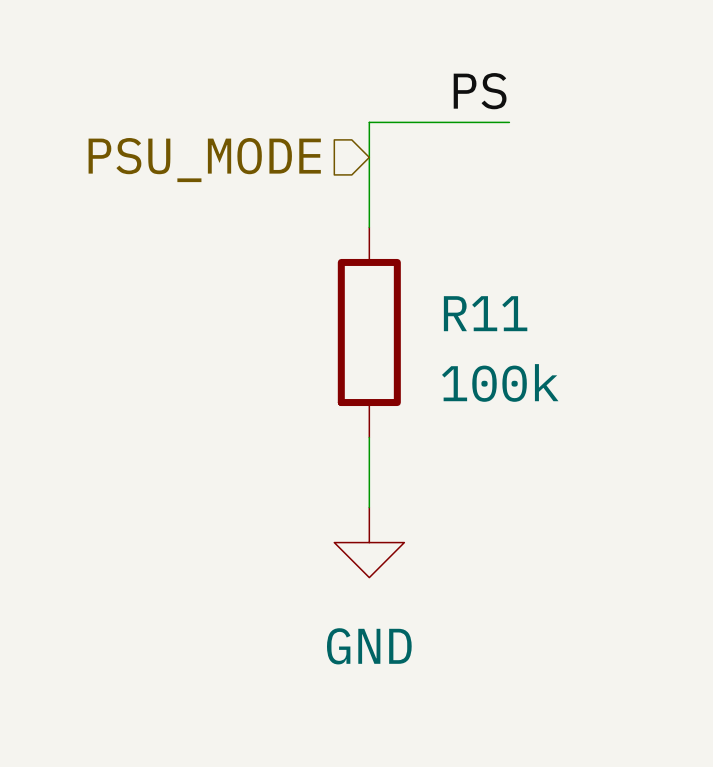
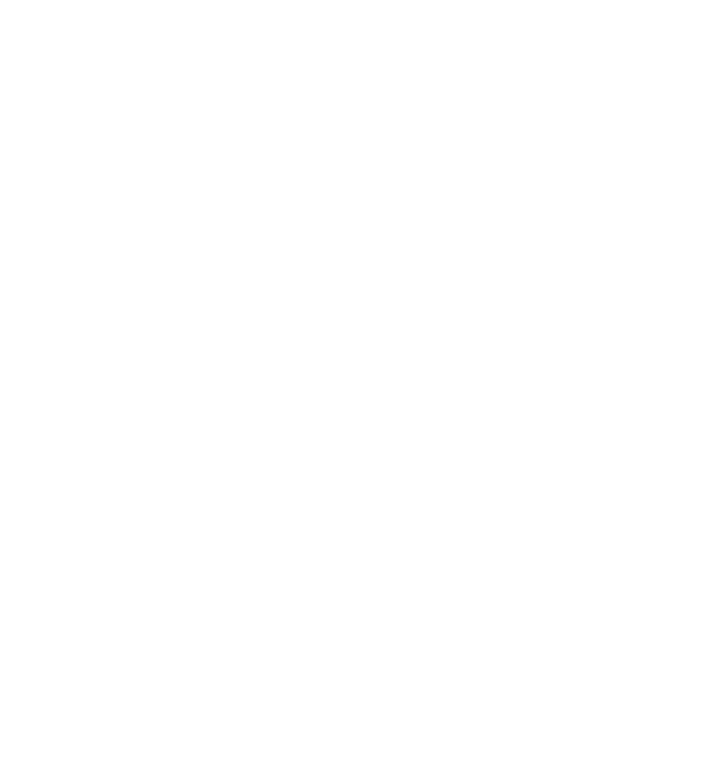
label: PS (480, 91) -> none
wire: (509, 122) (369, 122) (369, 227) -> none
hierarchical label: PSU_MODE (204, 160) -> none
R11: 100k (369, 332) -> none
wire: (369, 437) (369, 507) -> none
power symbol: GND (369, 542) -> none

